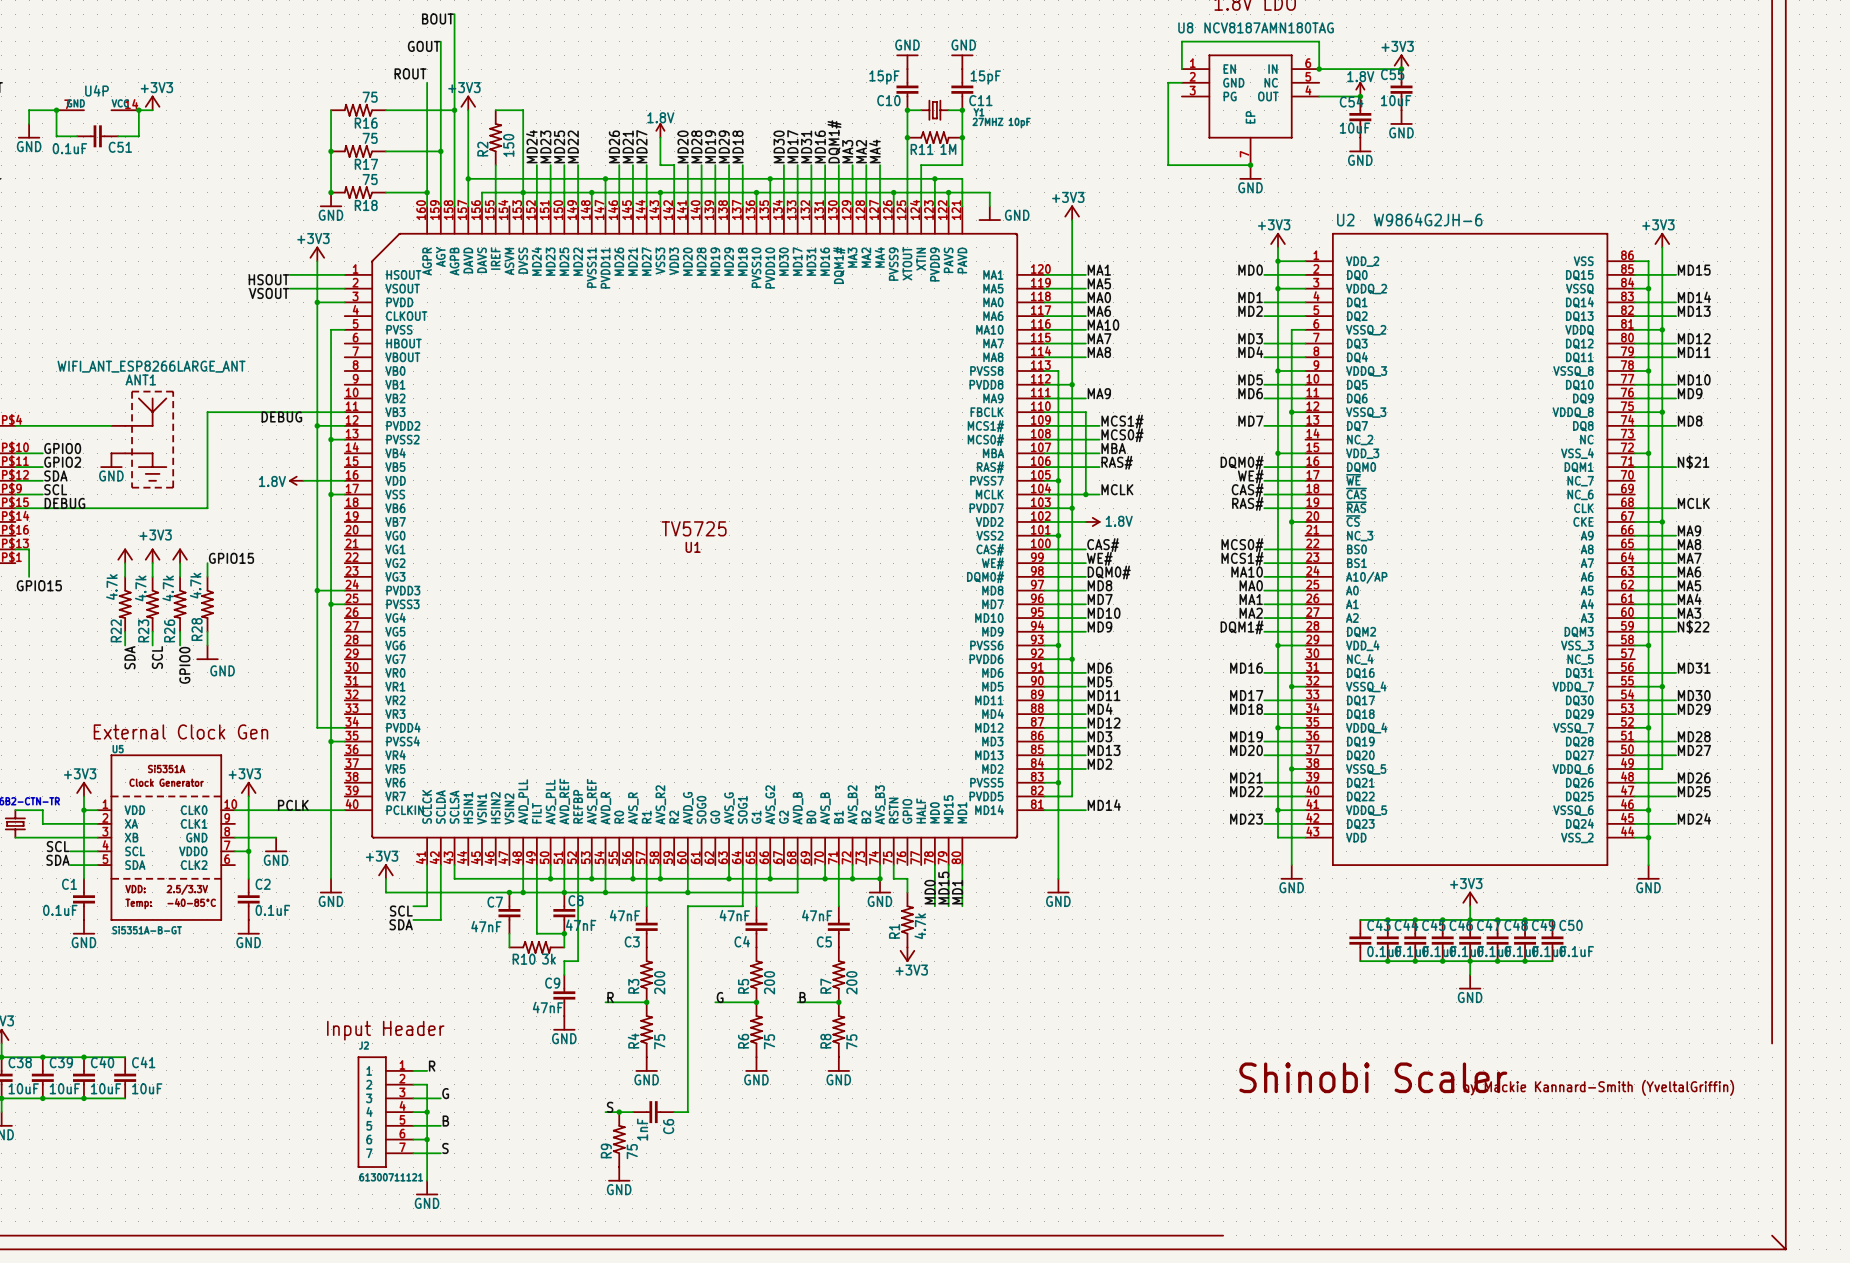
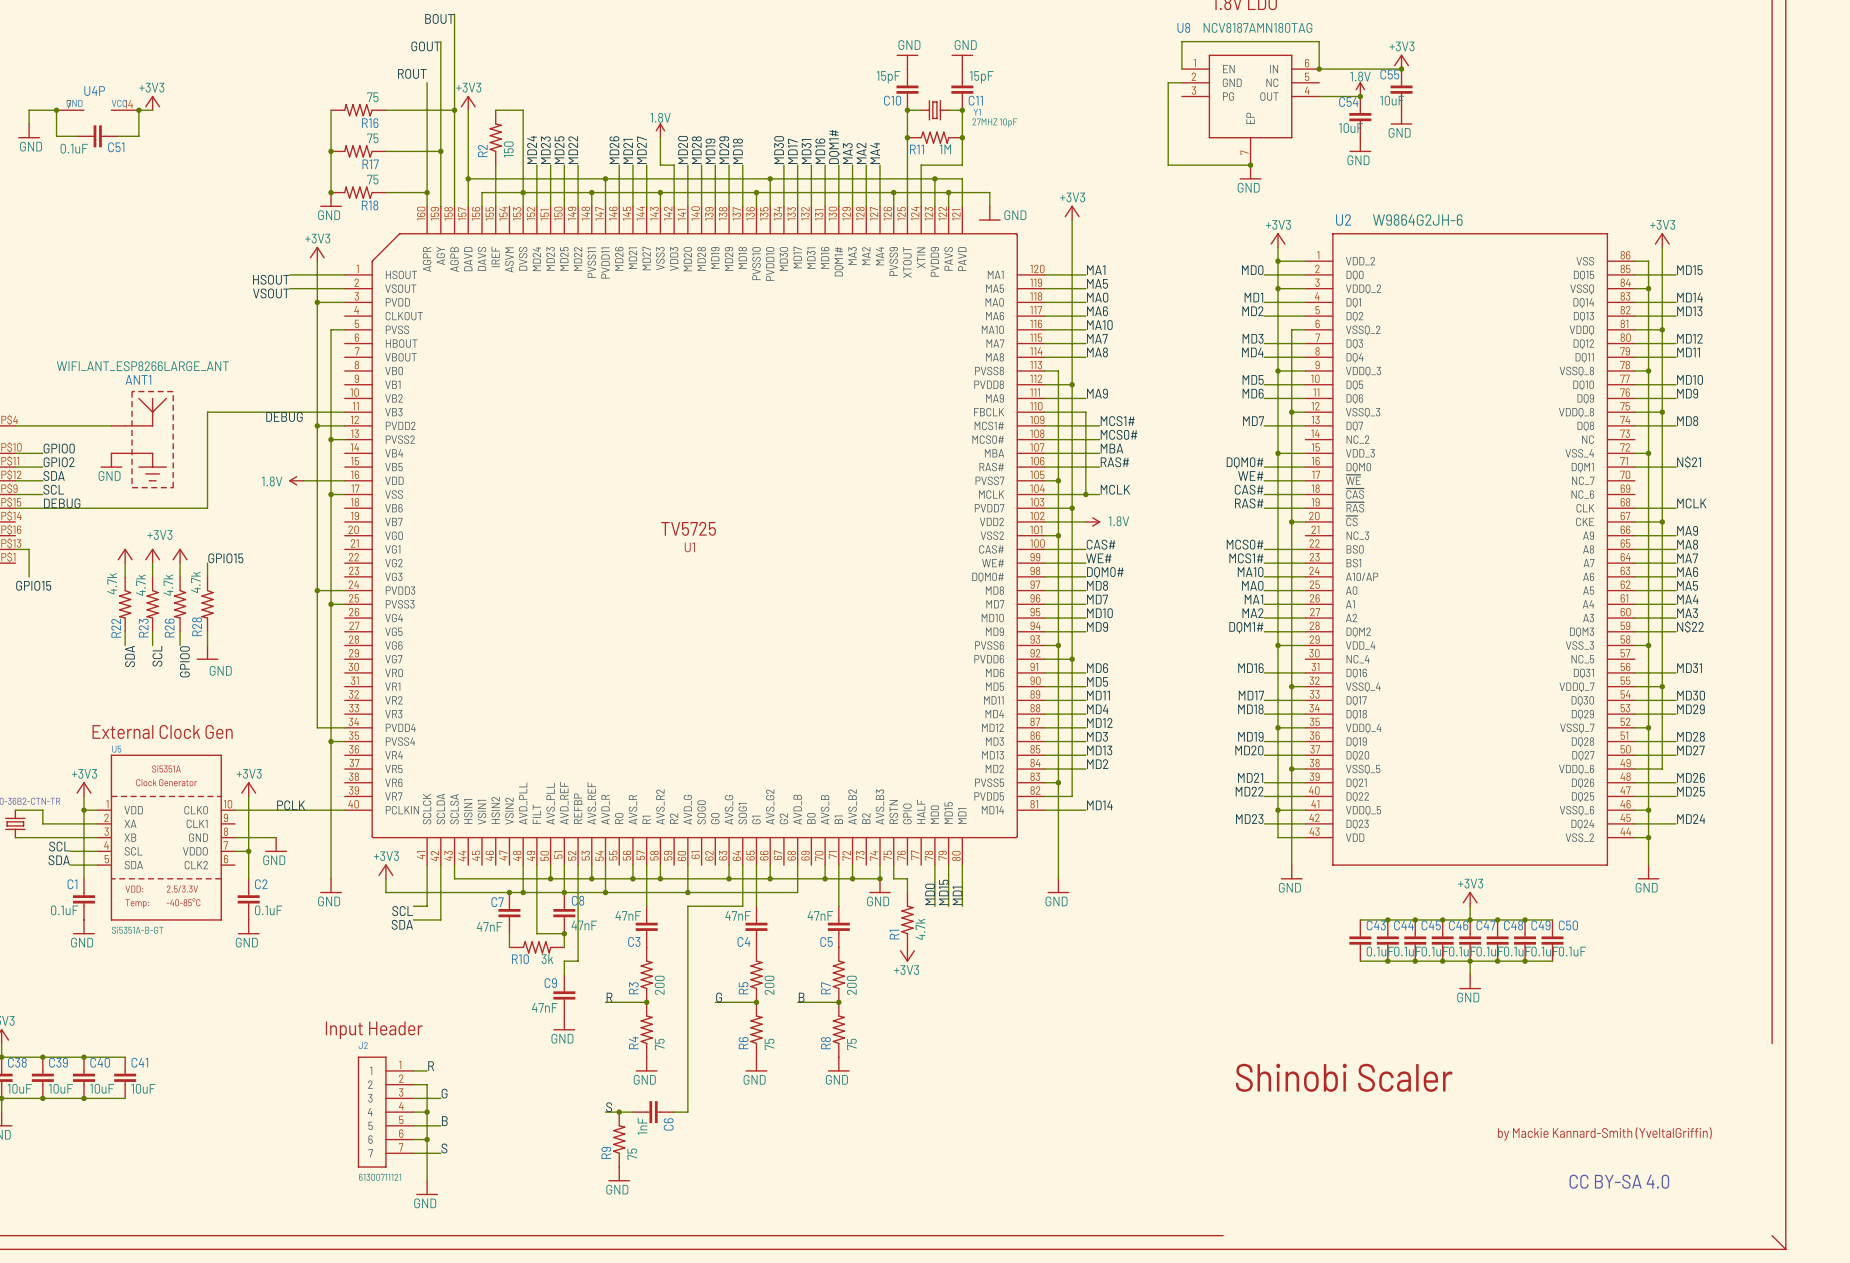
text position: by Mackie Kannard-Smith (YveltalGriffin) (1598, 1087) -> by Mackie Kannard-Smith (YveltalGriffin) (1604, 1133)
text: none -> CC BY-SA 4.0 (1619, 1181)

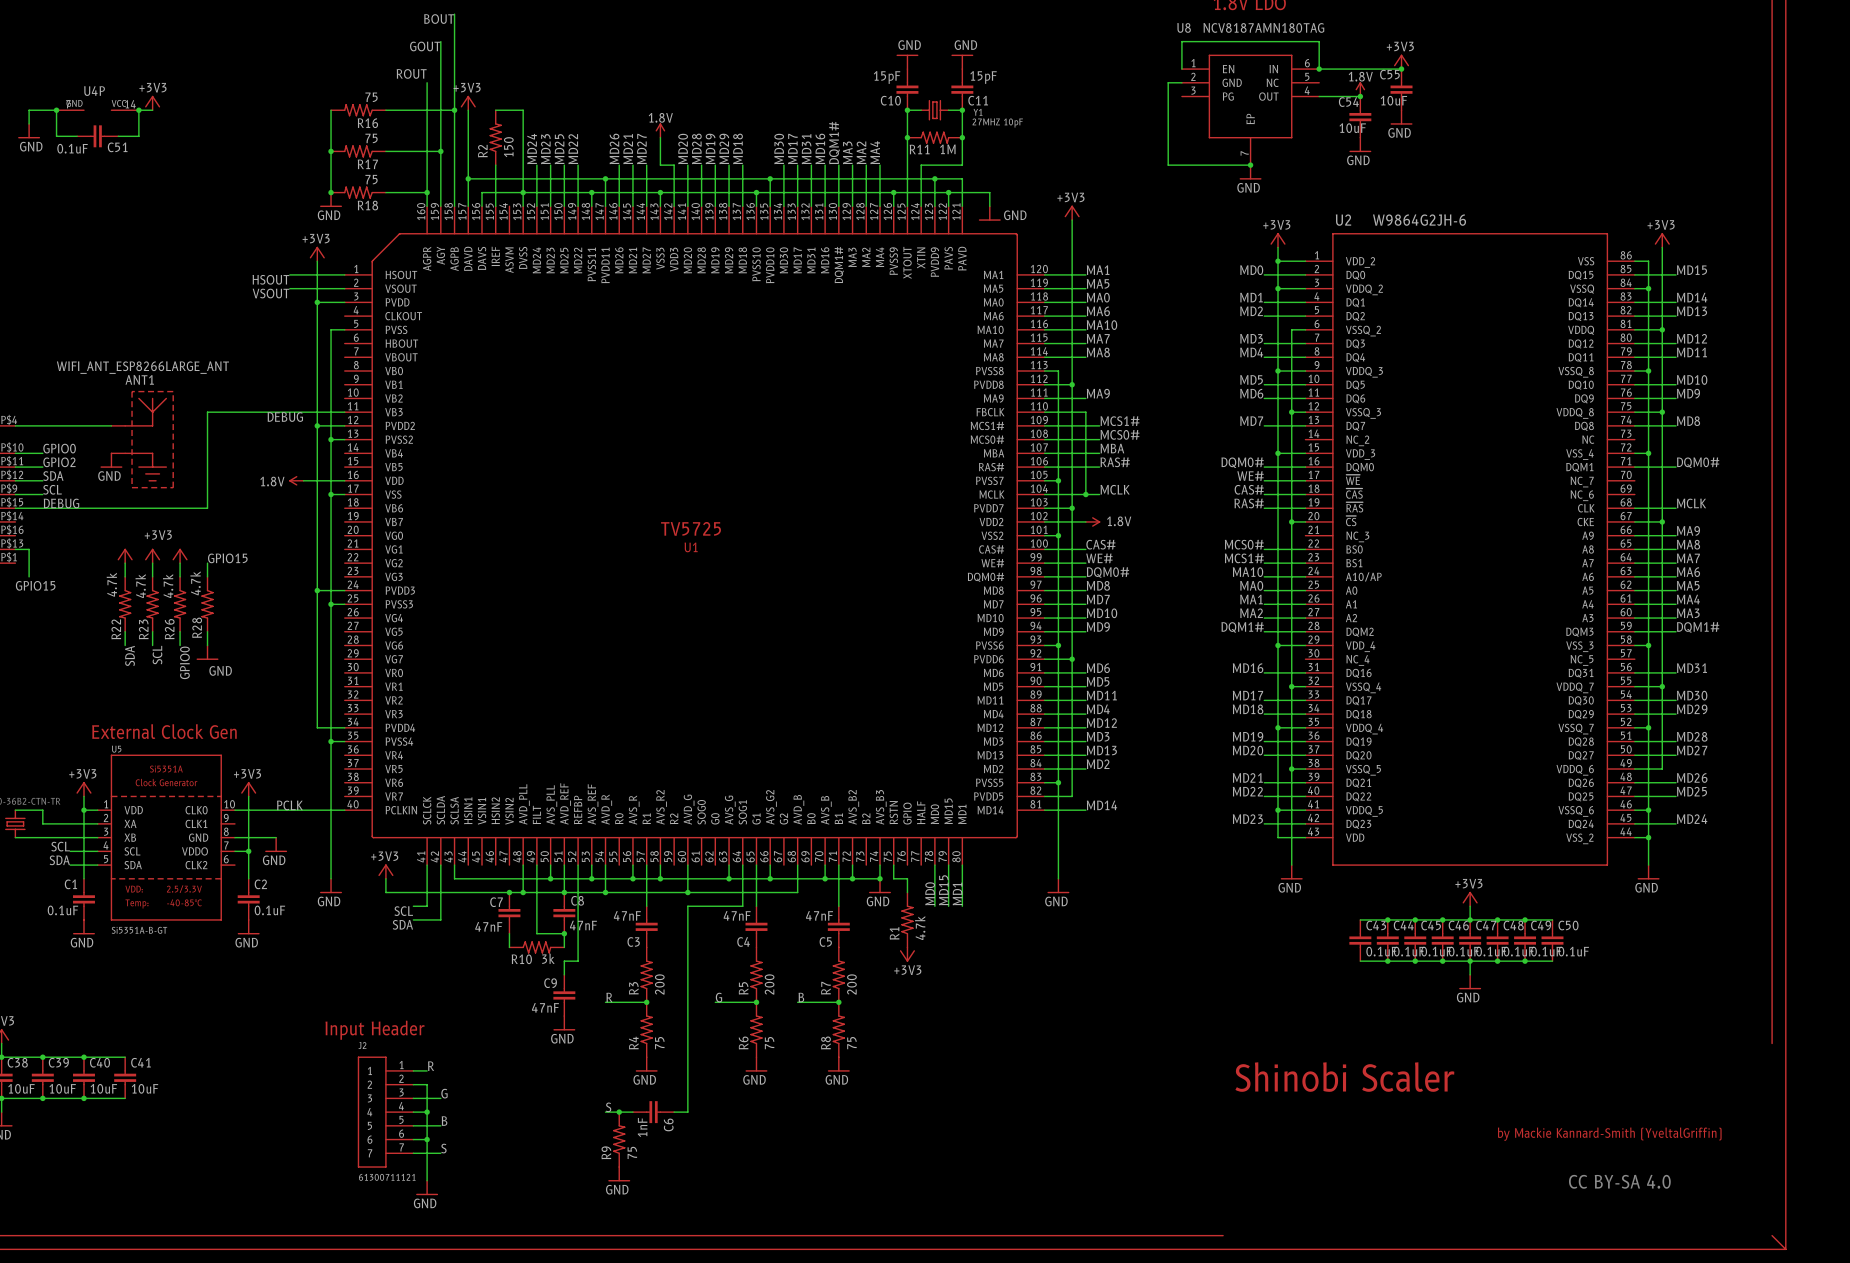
label: N$21 (1689, 462) -> DQM0# (1698, 462)
label: N$22 (1690, 626) -> DQM1# (1698, 627)

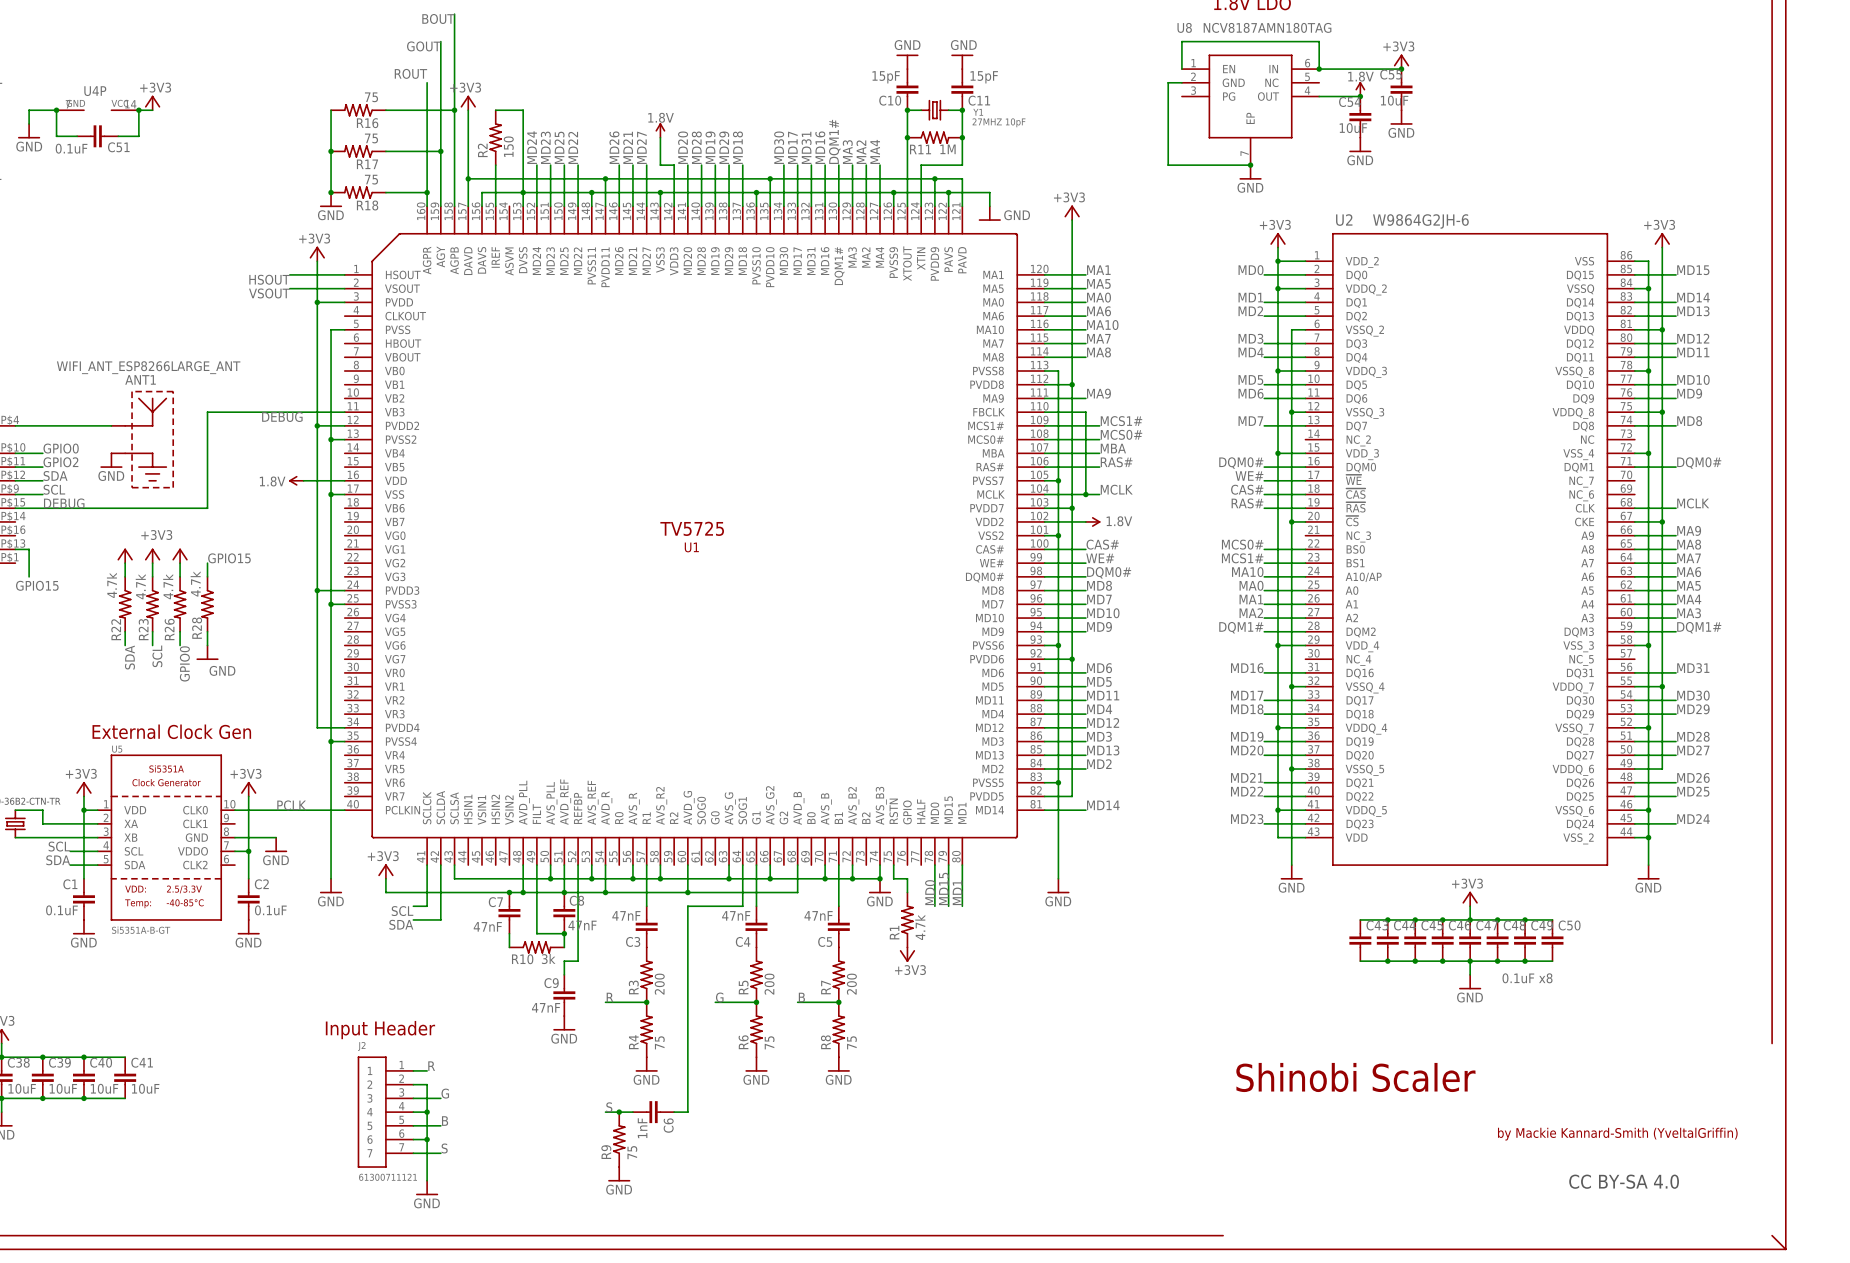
C43 value: 0.1uF (1381, 951) -> none
C44 value: 0.1uF (1409, 951) -> none
C45 value: 0.1uF (1436, 951) -> none
C46 value: 0.1uF (1463, 951) -> none
C47 value: 0.1uF (1491, 951) -> none
C48 value: 0.1uF (1518, 951) -> none
C49 value: 0.1uF (1546, 951) -> none
C50 value position: 0.1uF (1573, 951) -> 0.1uF (1518, 978)
text: none -> x8 (1545, 978)

